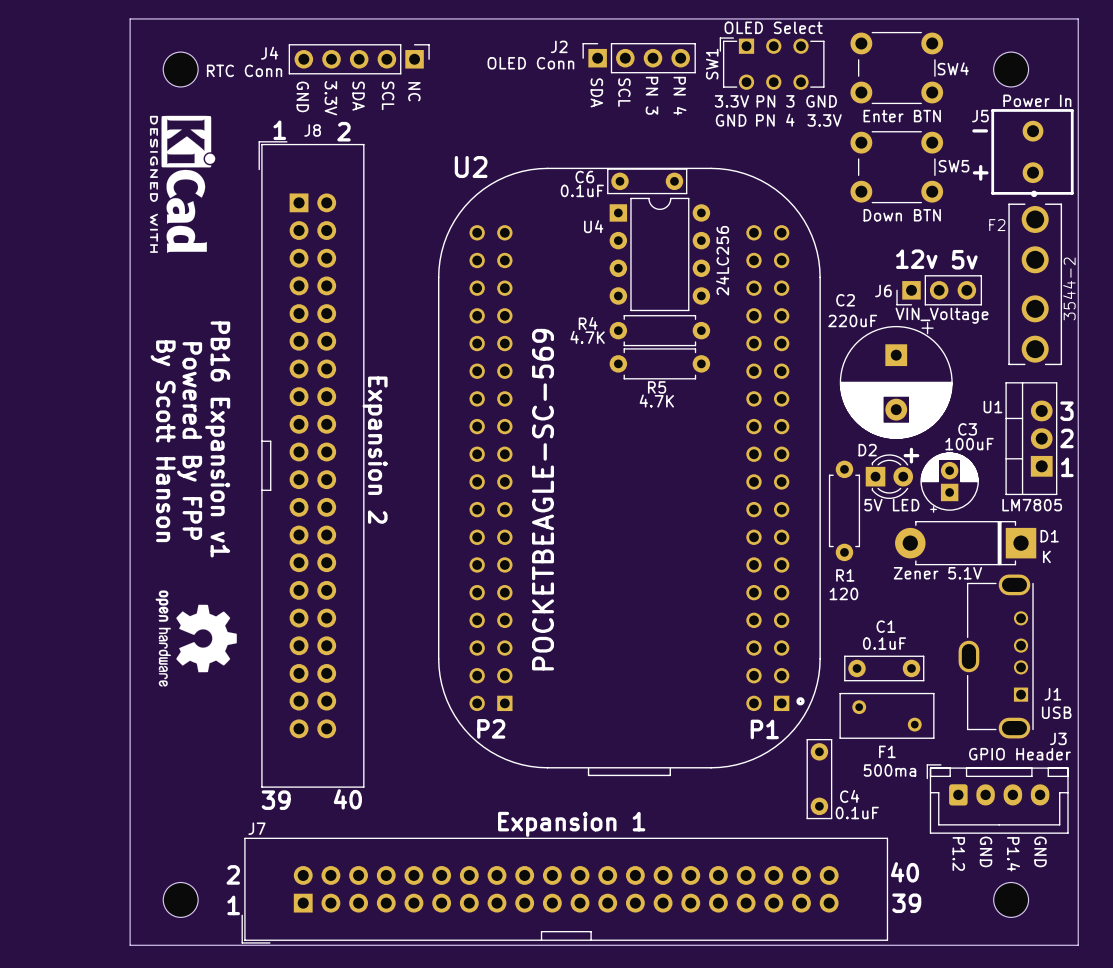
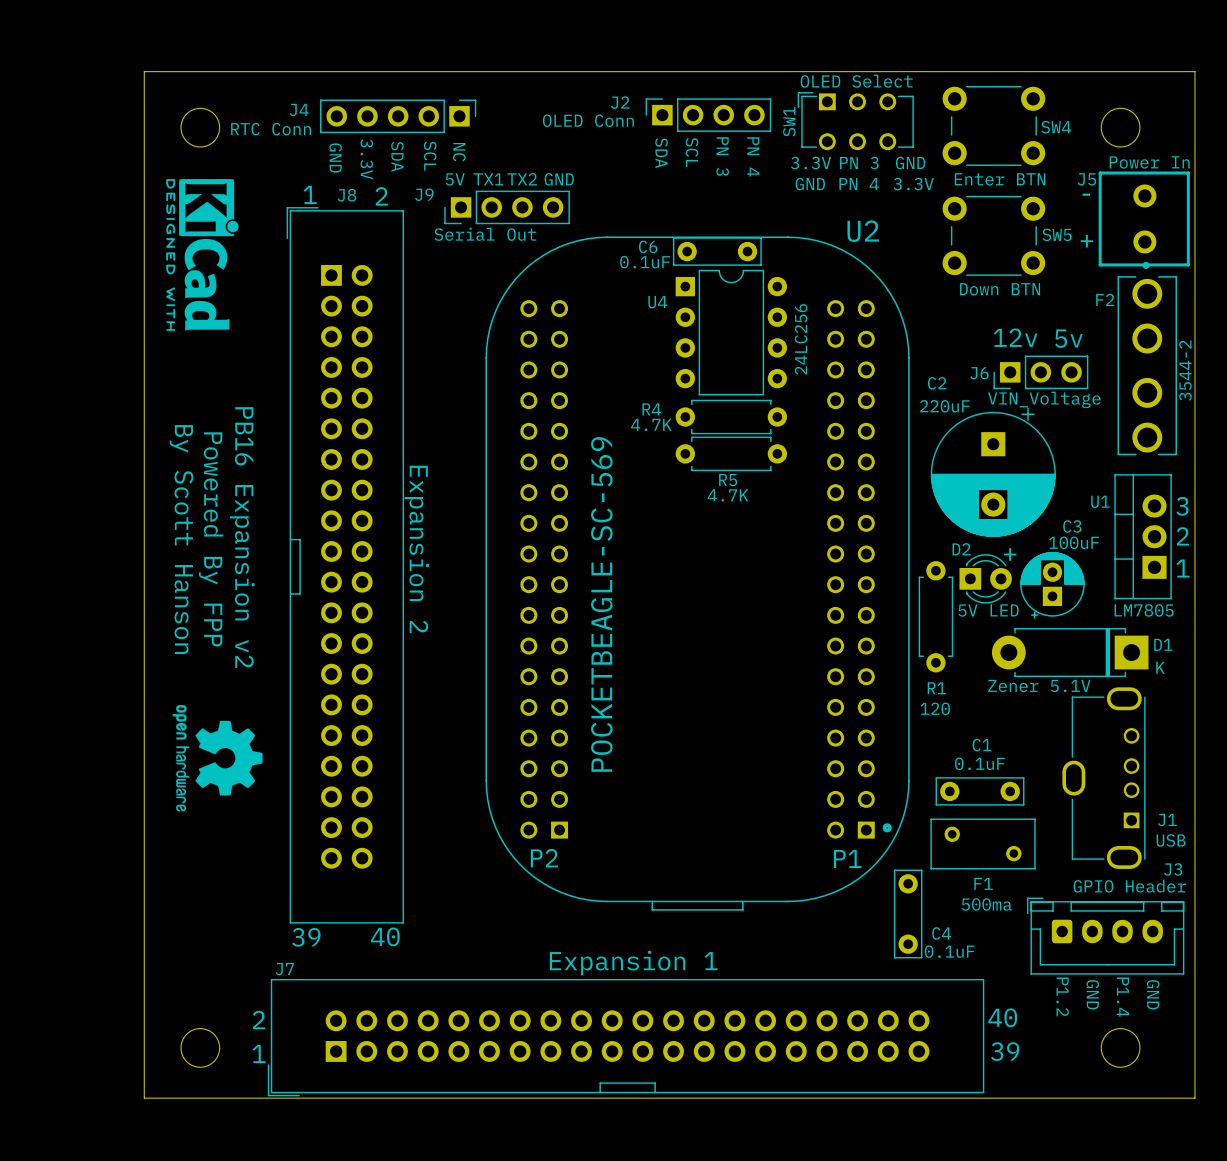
text: none -> 5V (455, 179)
text: none -> TX1 (488, 179)
text: none -> TX2 (522, 179)
text: none -> GND (559, 179)
J9: none -> Serial Out (507, 207)
U2 name position: U2 (471, 167) -> U2 (863, 231)
text: PB16 Expansion v1 (217, 439) -> PB16 Expansion v2 (242, 537)

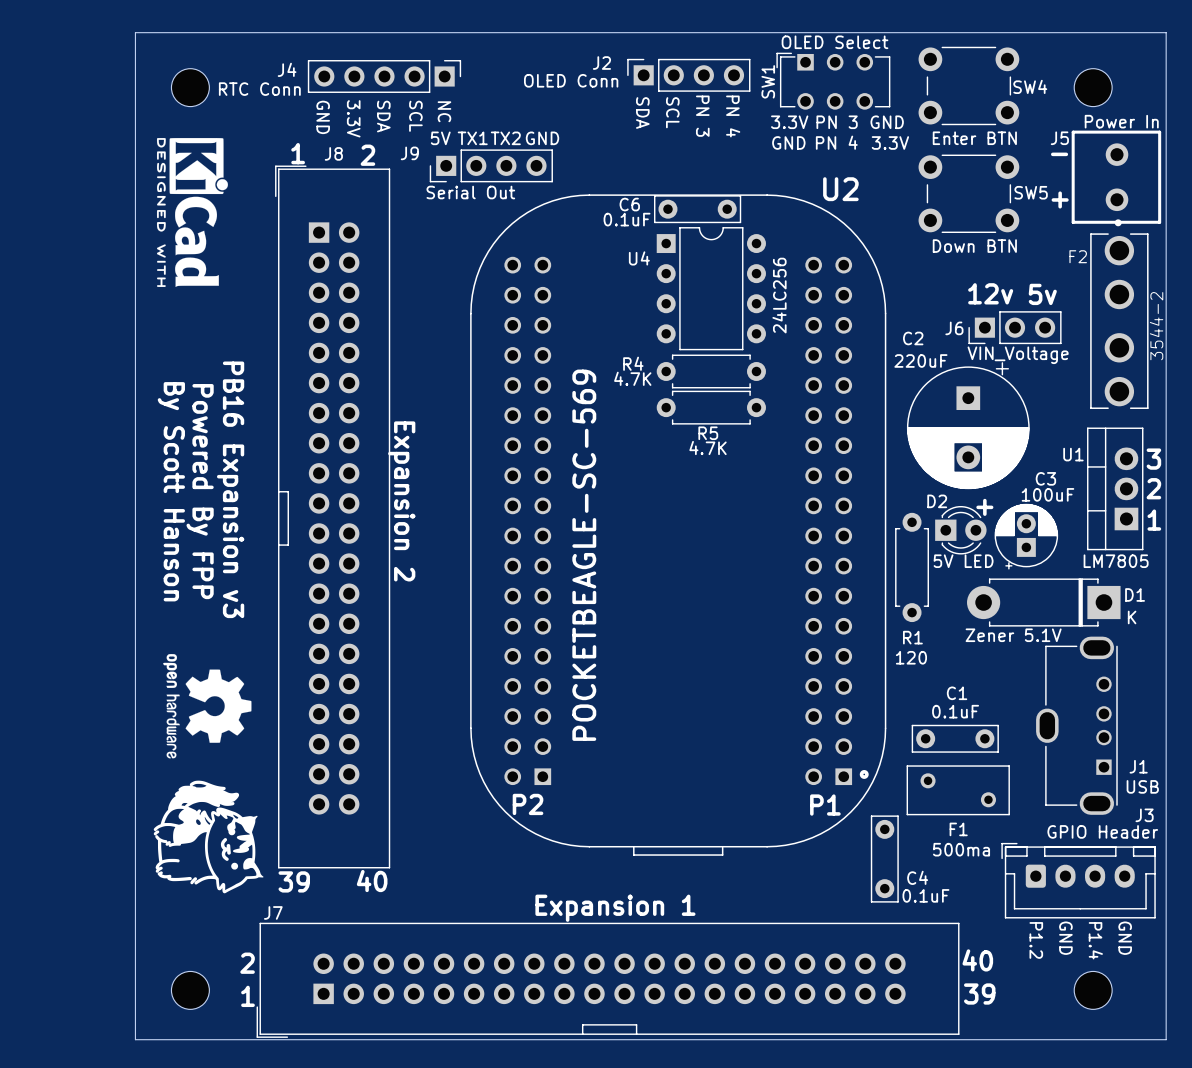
text: PB16 Expansion v2 (242, 537) -> PB16 Expansion v3 (230, 489)
drawing: none -> [153, 780, 264, 894]

